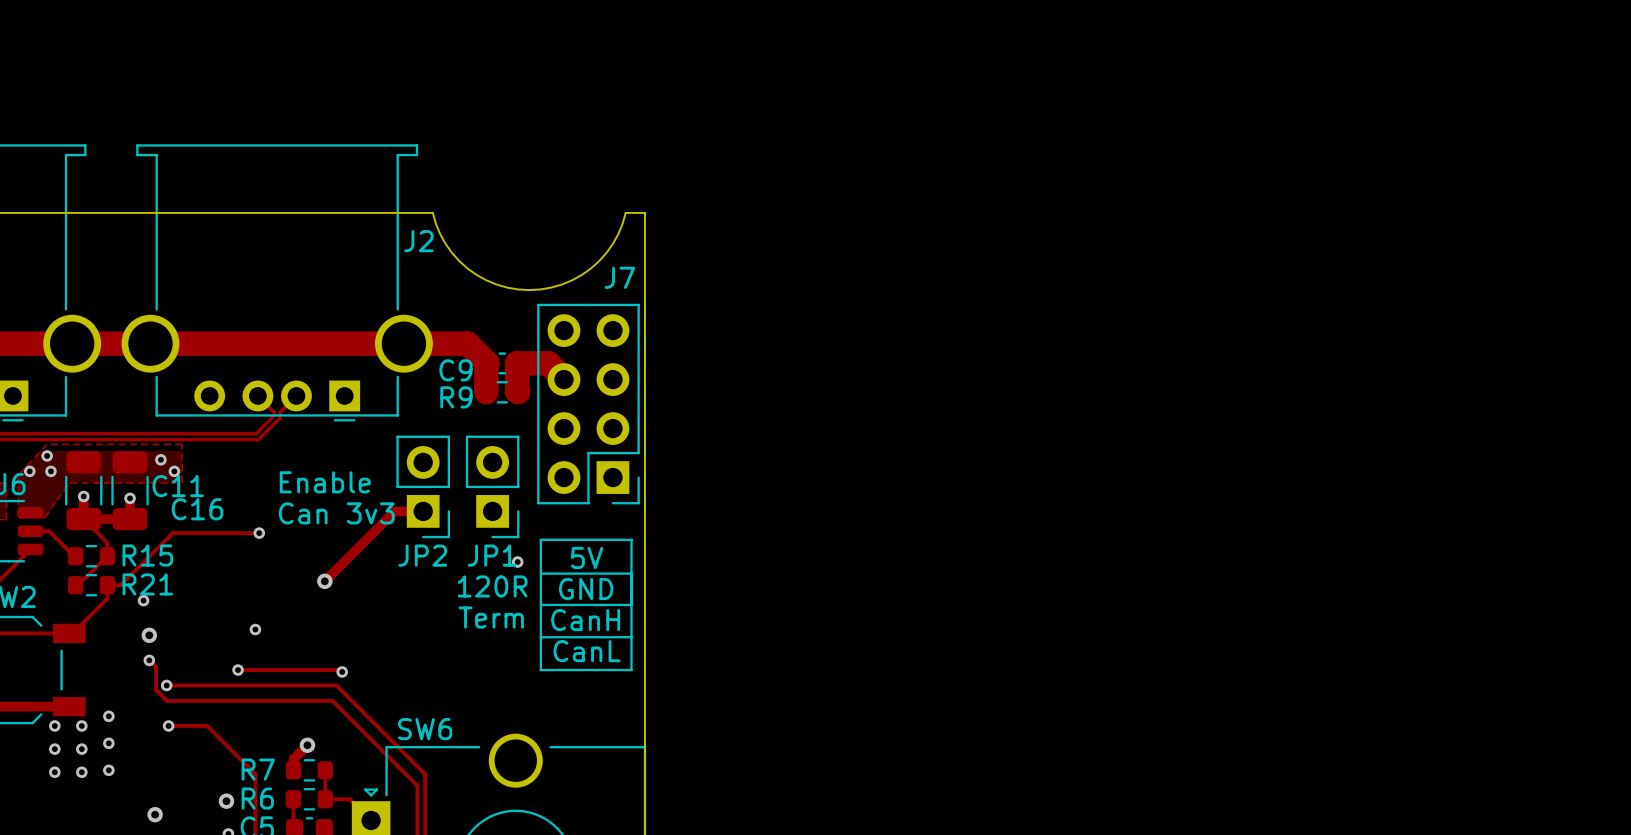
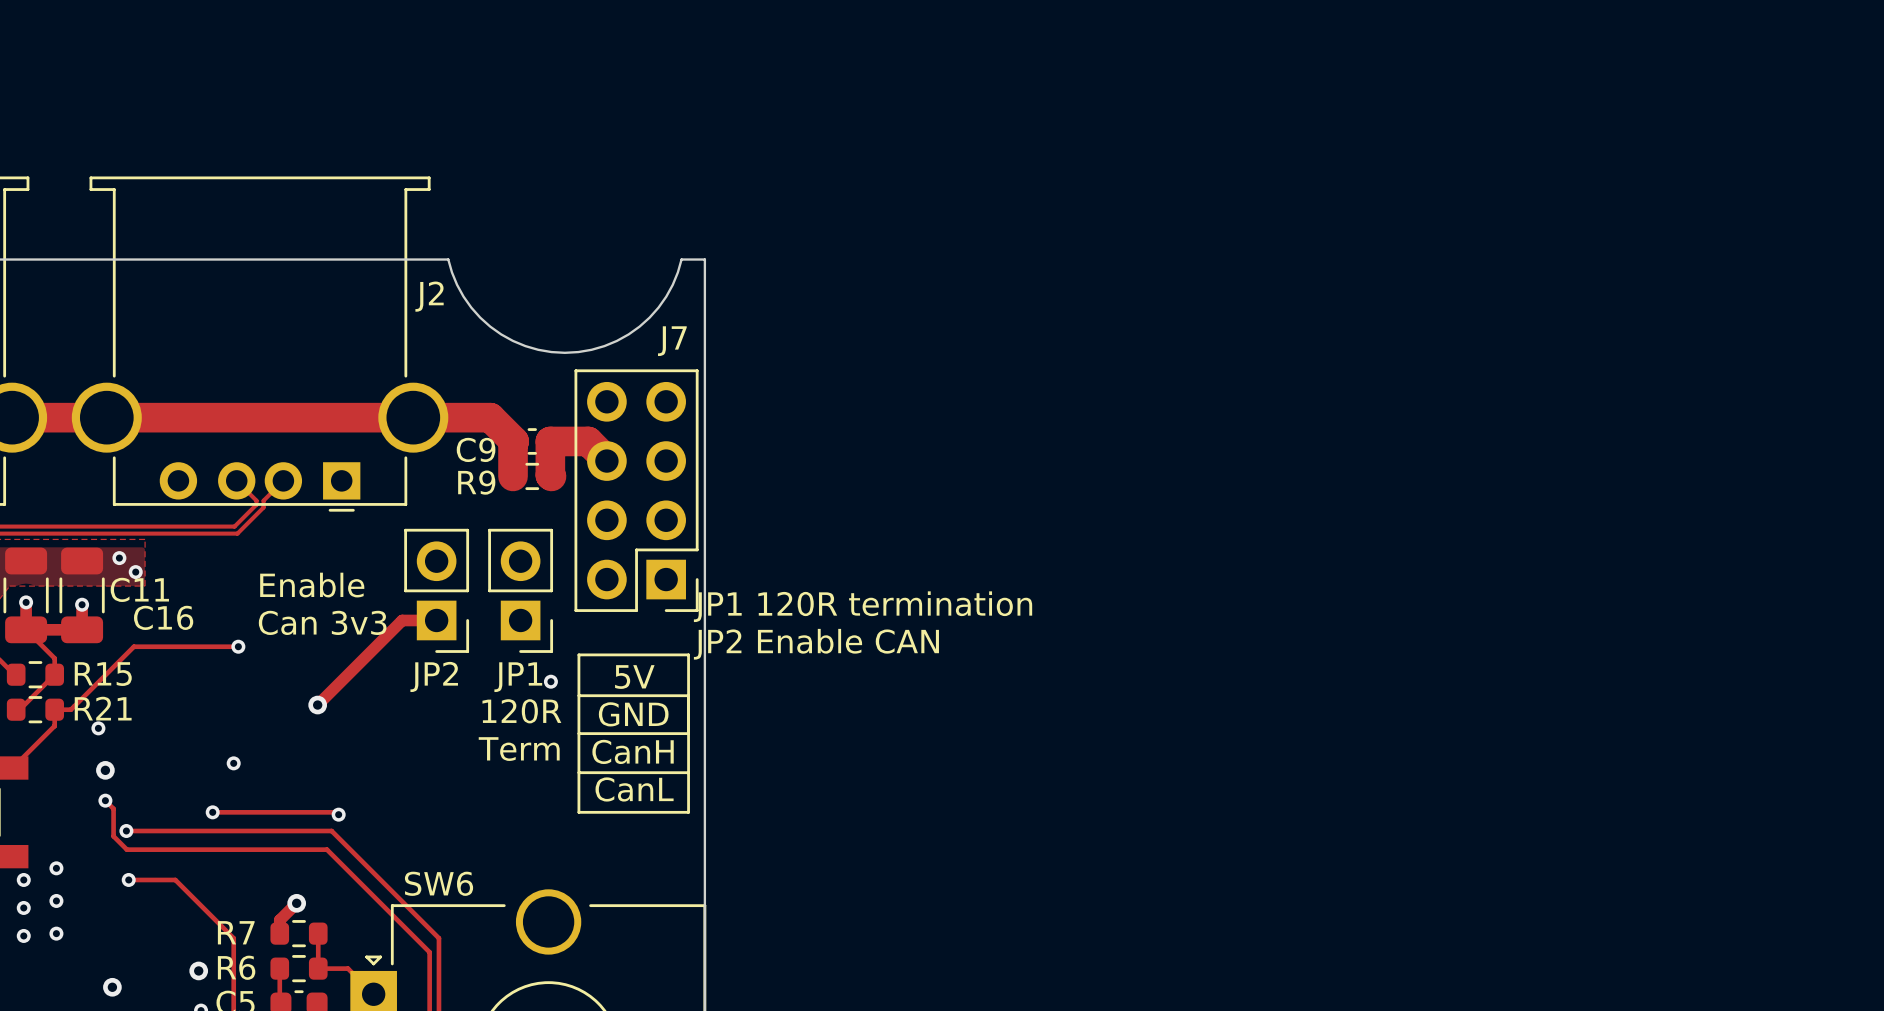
text: none -> JP1 120R termination (863, 606)
text: none -> JP2 Enable CAN (816, 644)

